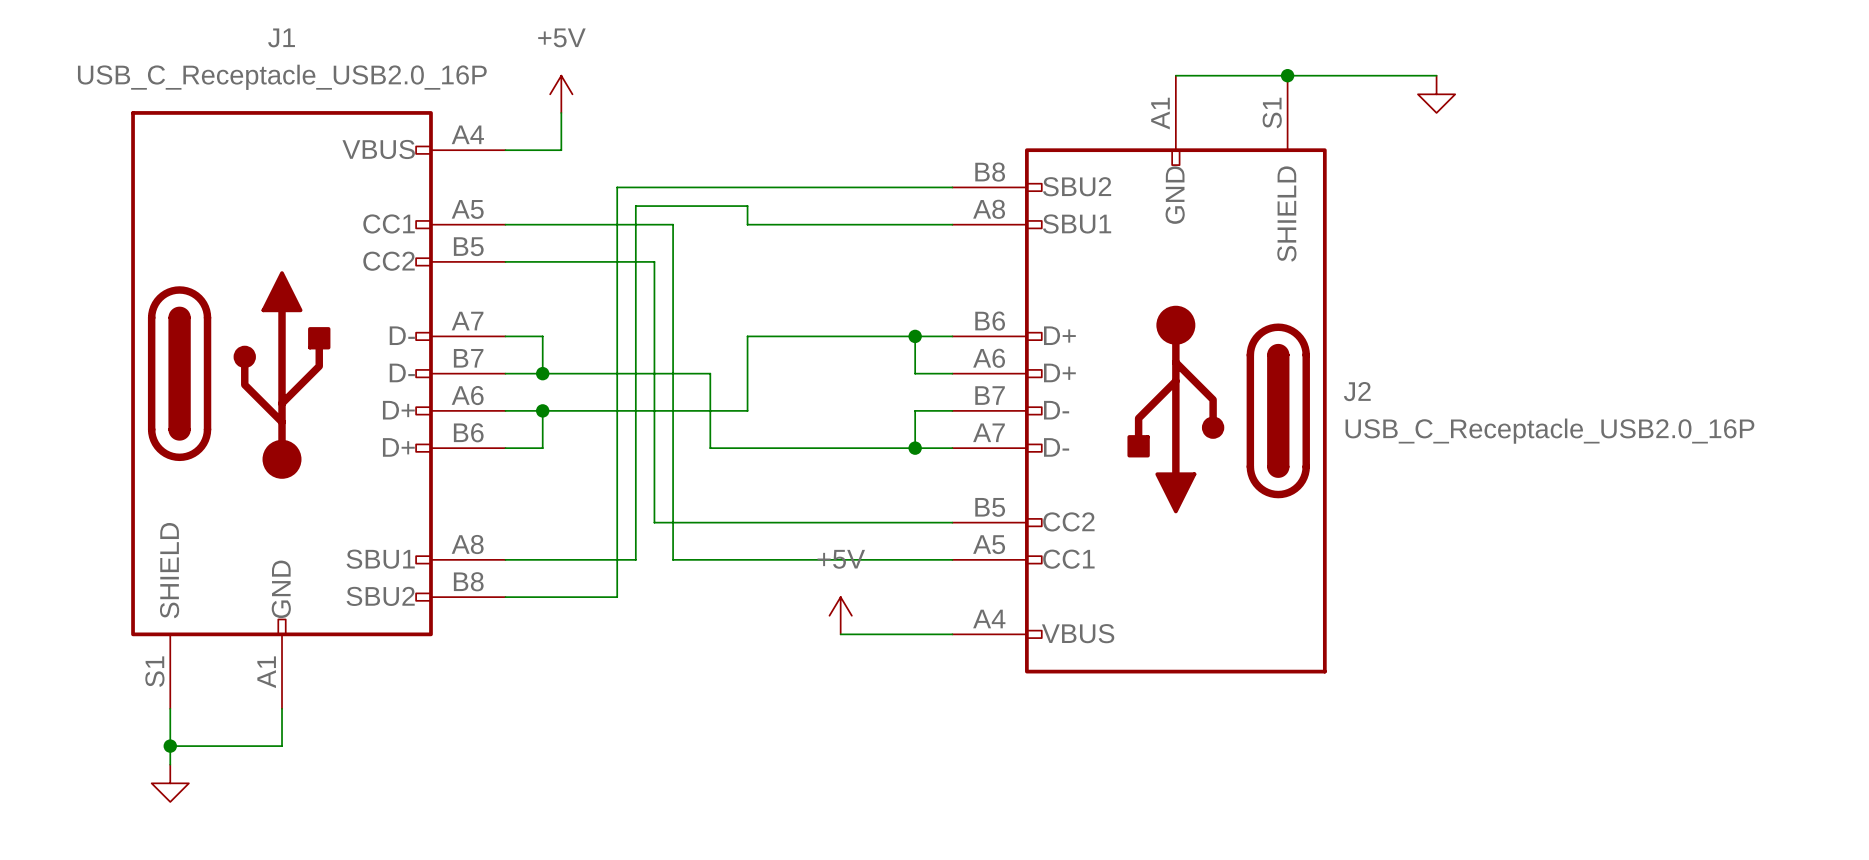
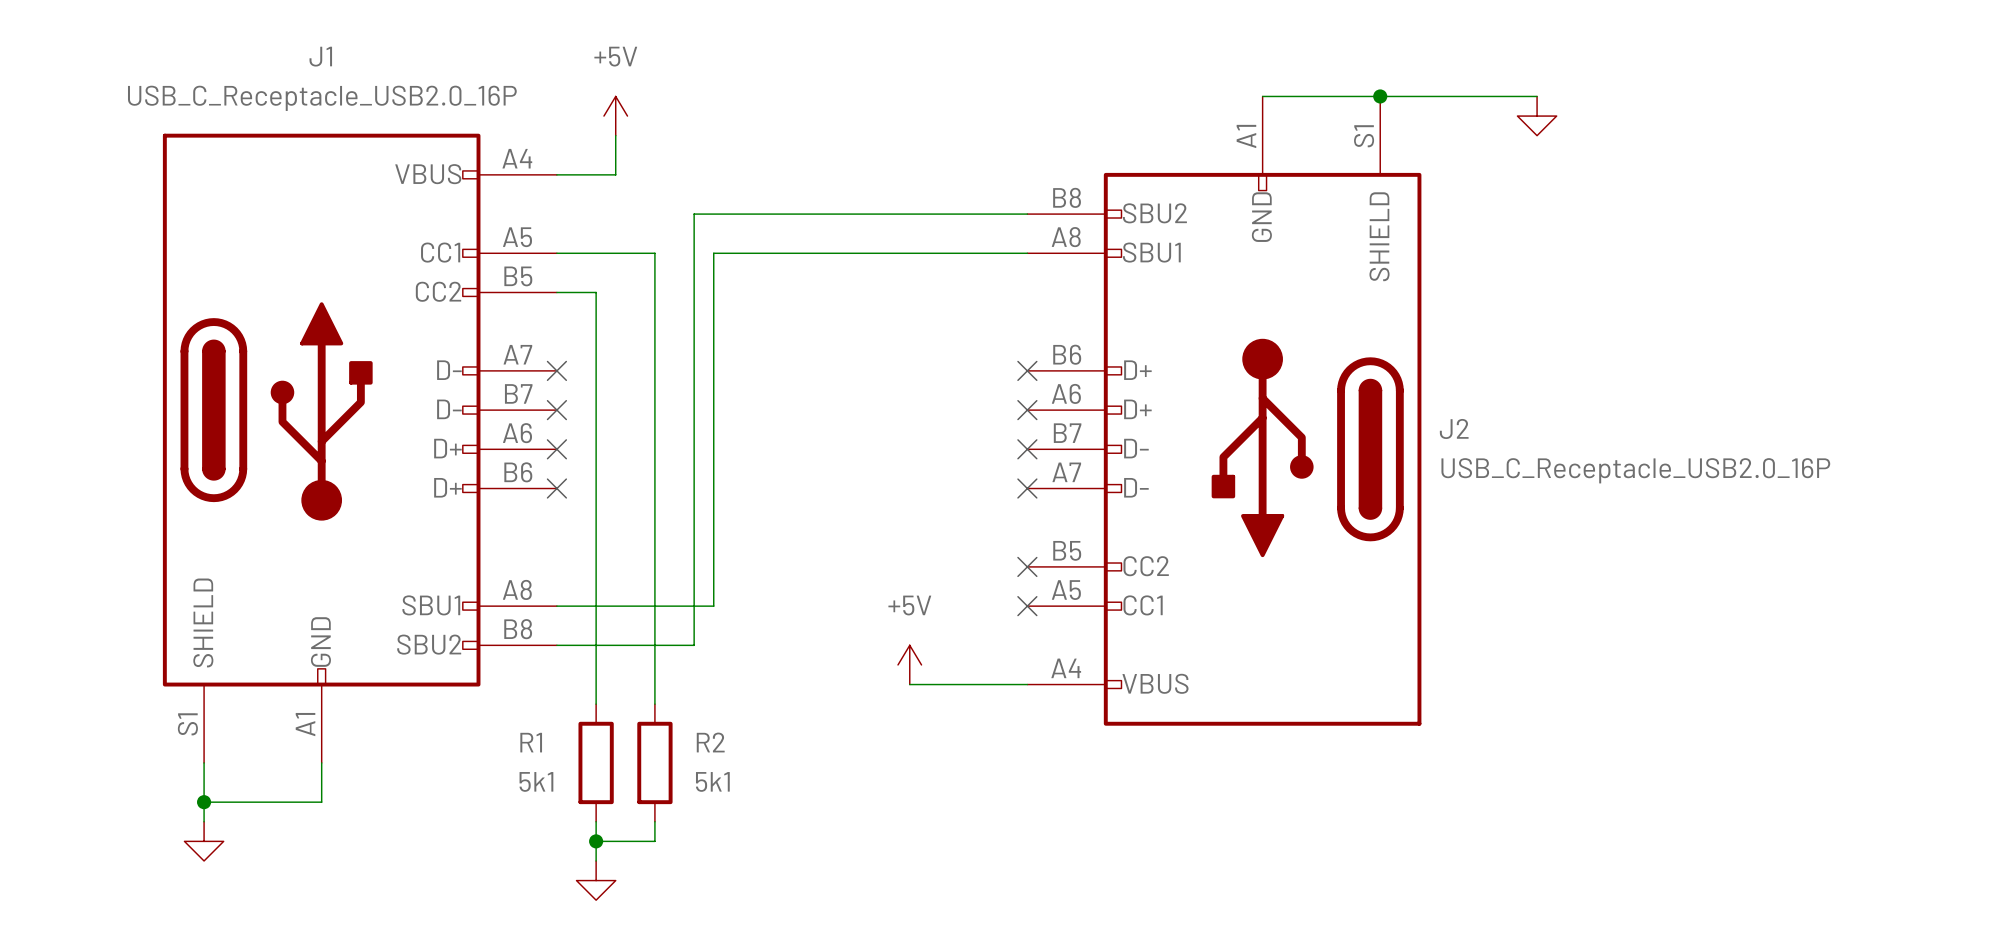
wire: (635, 187) (617, 187) (617, 597) -> (713, 566) (713, 606) (694, 606) (694, 645) (674, 645)
wire: none -> (694, 214) (694, 233)
wire: (635, 206) (747, 206) (747, 224) -> (733, 253) (811, 253)
wire: (598, 224) (654, 224) -> (713, 292) (713, 253)
wire: none -> (654, 253) (654, 704)
wire: (673, 224) (673, 559) (952, 559) -> none
wire: (542, 261) (654, 261) -> none
wire: (505, 336) (542, 336) -> (596, 292) (596, 370)
no-connect mark: none -> (556, 370)
wire: (915, 336) (915, 373) (952, 373) -> none
junction: (915, 336) -> none
wire: (952, 336) (747, 336) (747, 410) (505, 410) -> none
no-connect mark: none -> (1027, 370)
wire: (505, 373) (710, 373) (710, 448) (952, 448) -> none
no-connect mark: none -> (556, 410)
wire: none -> (596, 410) (596, 449)
junction: (542, 373) -> none
no-connect mark: none -> (1027, 410)
no-connect mark: none -> (556, 449)
junction: (542, 410) -> none
wire: (952, 410) (915, 410) (915, 448) -> none
no-connect mark: none -> (1027, 449)
wire: (505, 448) (542, 448) -> (596, 704) (596, 488)
no-connect mark: none -> (556, 488)
junction: (915, 448) -> none
no-connect mark: none -> (1027, 488)
wire: (654, 522) (952, 522) -> none
no-connect mark: none -> (1027, 566)
no-connect mark: none -> (1027, 606)
R1: none -> 5k1 (596, 762)
R2: none -> 5k1 (654, 762)
wire: none -> (596, 821) (596, 860)
wire: none -> (654, 821) (654, 841) (596, 841)
junction: none -> (596, 841)
power symbol: none -> (596, 880)

